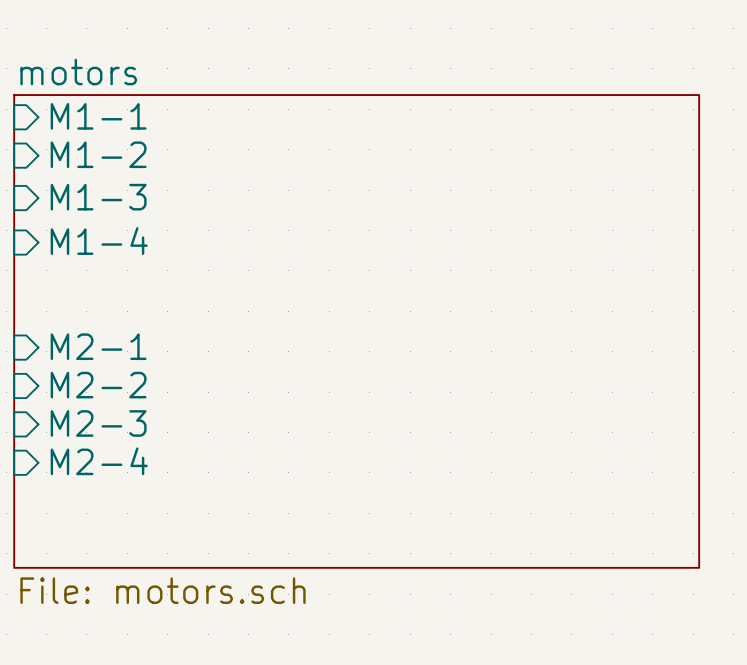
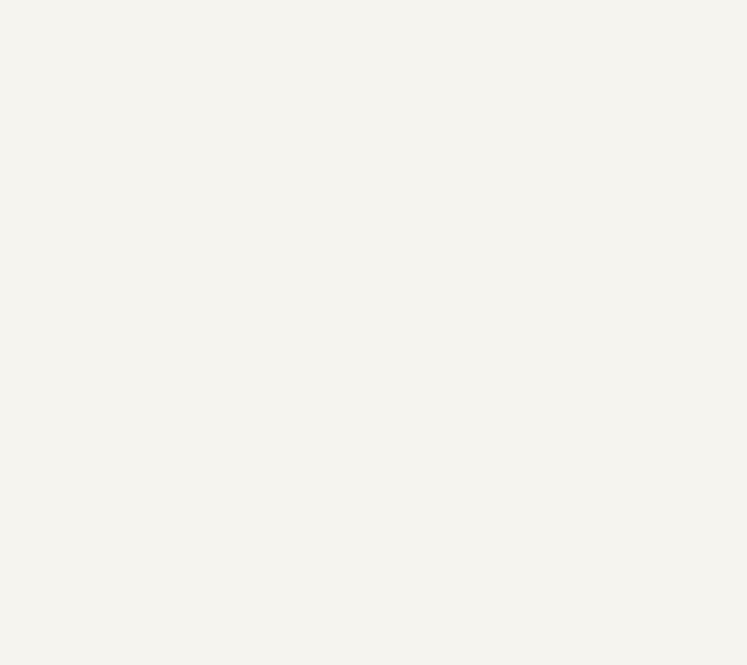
sheet pin: M1-1 (98, 116) -> none
sheet pin: M1-2 (98, 154) -> none
sheet pin: M1-3 (98, 197) -> none
sheet pin: M1-4 (99, 241) -> none
sheet motors: File: motors.sch (356, 331) -> none
sheet pin: M2-1 (98, 346) -> none
sheet pin: M2-2 (98, 385) -> none
sheet pin: M2-3 (98, 423) -> none
sheet pin: M2-4 (99, 461) -> none

